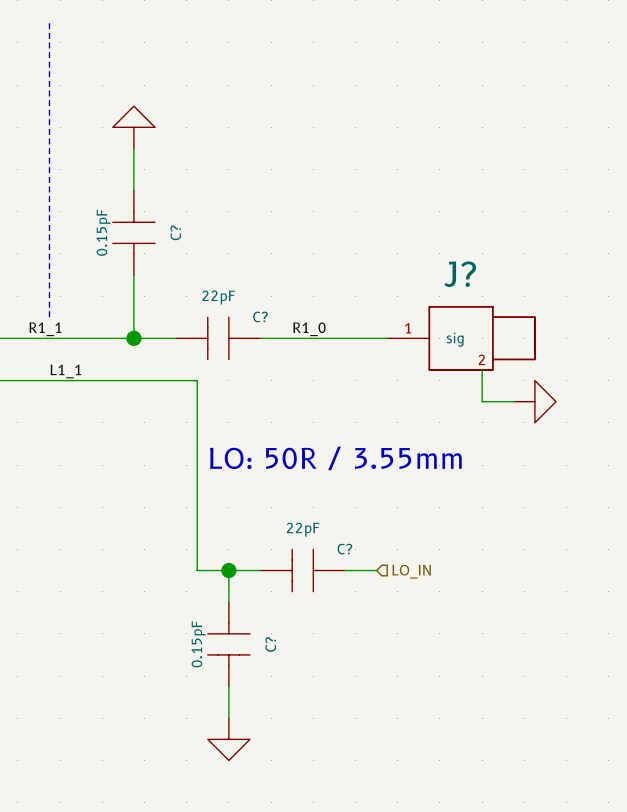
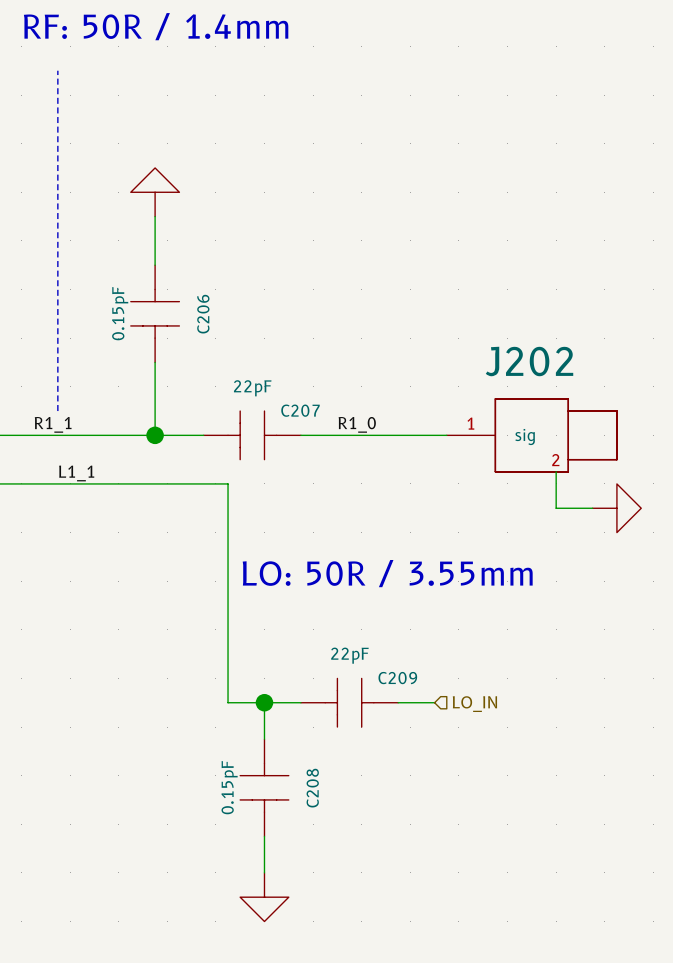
C? name: C? (175, 232) -> C206 (203, 314)
J? name: J? (460, 274) -> J202 (529, 361)
C? name: C? (260, 316) -> C207 (300, 410)
C? name: C? (344, 549) -> C209 (397, 678)
C? name: C? (270, 644) -> C208 (312, 788)

